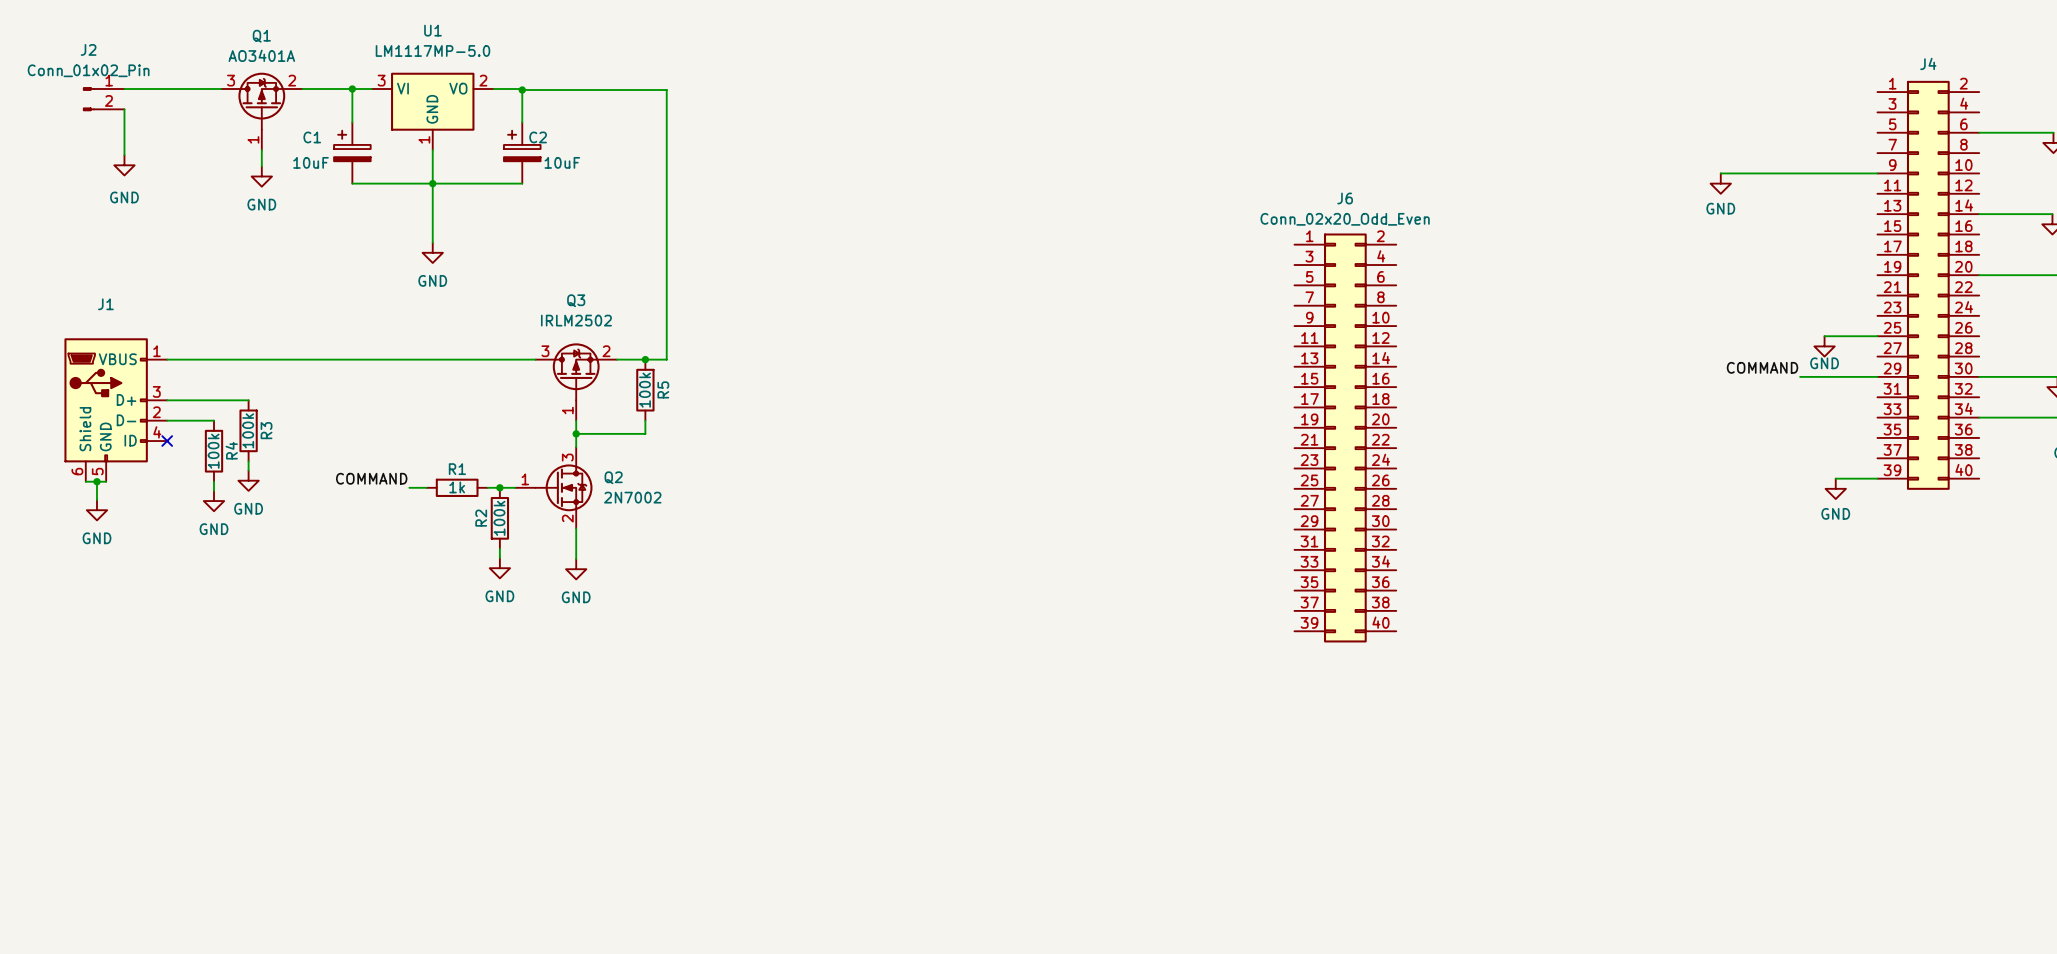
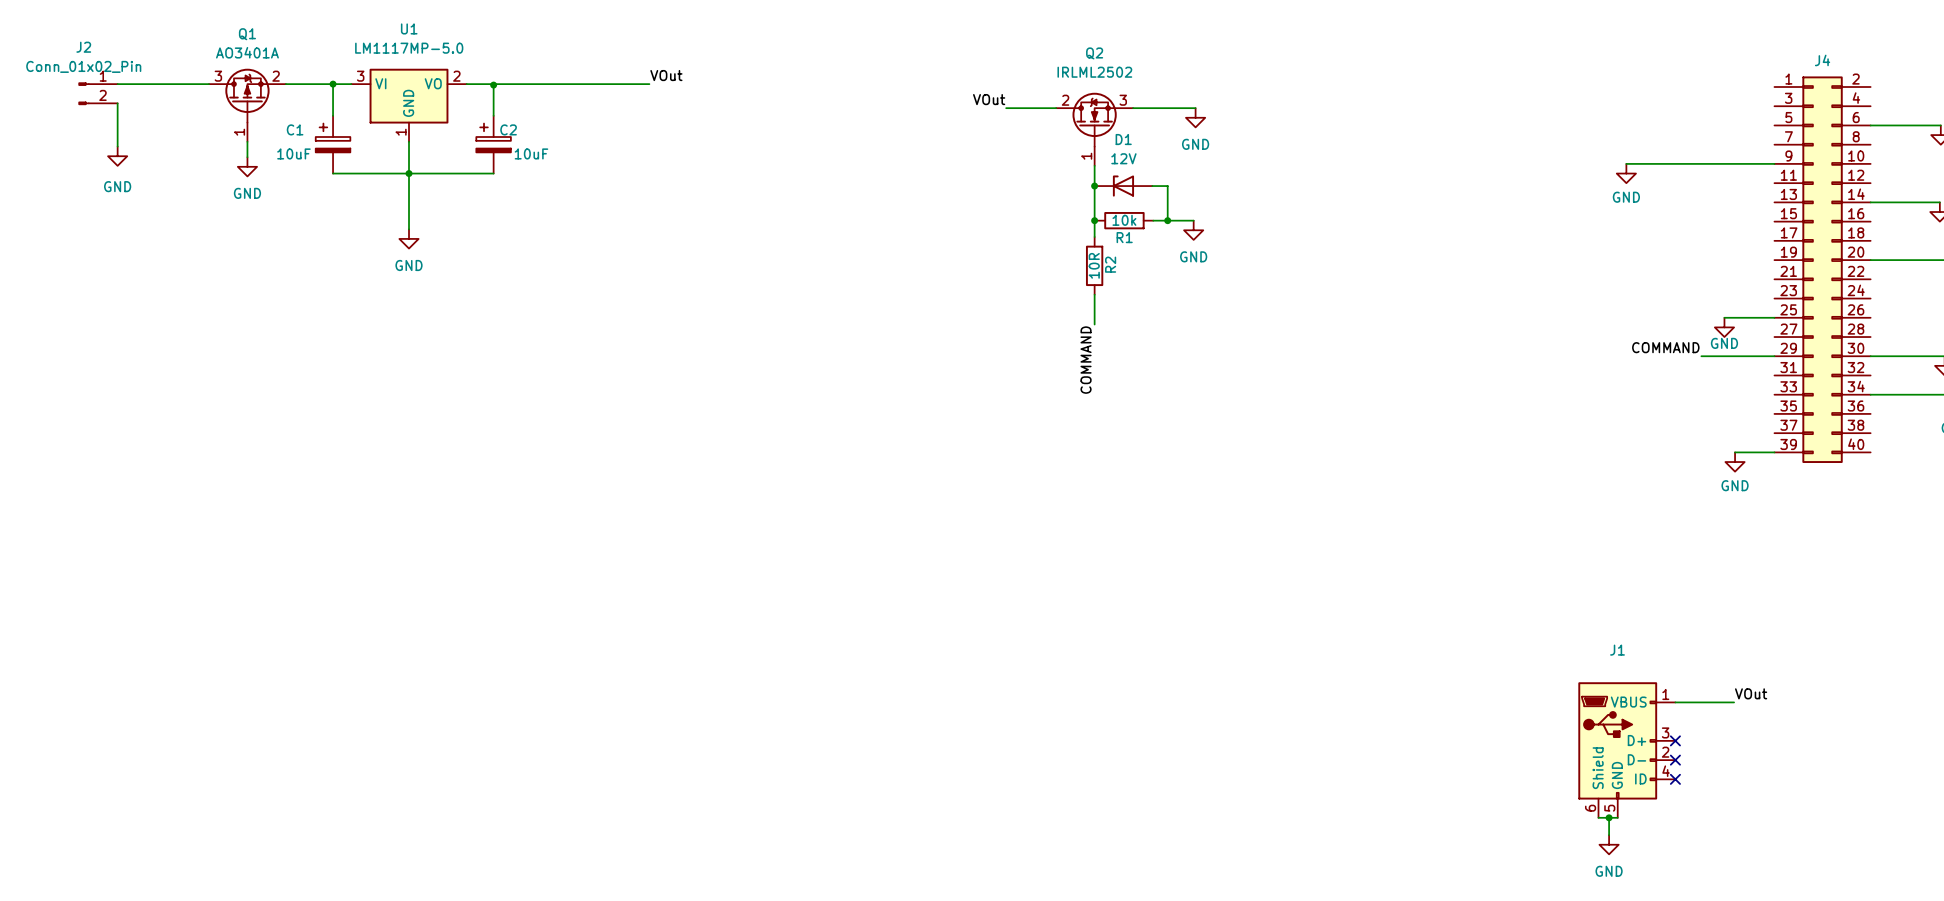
label: none -> VOut (666, 75)
wire: none -> (493, 84) (649, 84)
wire: (522, 90) (666, 90) (666, 359) (616, 359) -> none
label: none -> VOut (989, 99)
wire: none -> (1006, 108) (1056, 108)
wire: none -> (1133, 108) (1195, 108)
power symbol: none -> GND (1195, 117)
wire: none -> (1094, 165) (1094, 237)
junction: none -> (1094, 186)
D1: none -> 12V (1123, 186)
wire: none -> (1152, 186) (1167, 186) (1167, 220)
junction: none -> (1094, 220)
wire: none -> (1153, 220) (1193, 220)
junction: none -> (1167, 220)
power symbol: none -> GND (1193, 230)
wire: none -> (1094, 294) (1094, 324)
wire: (167, 359) (535, 359) -> none
junction: (645, 359) -> none
label: none -> COMMAND (1086, 360)
Q3: IRLM2502 (576, 382) -> none
R5: 100k (645, 390) -> none
wire: (167, 400) (248, 400) -> none
J1 position: (115, 409) -> (1626, 750)
wire: (167, 420) (214, 420) -> none
wire: (576, 420) (576, 447) -> none
wire: (645, 420) (645, 433) (576, 433) -> none
R3: 100k (248, 430) -> none
junction: (576, 433) -> none
J6: Conn_02x20_Odd_Even (1345, 437) -> none
no-connect mark: (167, 441) -> none
Q2 symbol: [515, 447, 593, 529] -> [1056, 92, 1134, 166]
R4: 100k (214, 451) -> none
wire: (248, 461) (248, 470) -> none
R1 name position: R1 (457, 469) -> R1 (1124, 237)
Q2 name position: Q2 (613, 477) -> Q2 (1094, 53)
label: COMMAND (371, 478) -> none
power symbol: GND (248, 480) -> none
wire: (85, 481) (106, 481) -> none
wire: (96, 481) (96, 500) -> none
junction: (96, 481) -> none
wire: (214, 481) (214, 490) -> none
wire: (409, 487) (426, 487) -> none
R1 position: (457, 487) -> (1124, 220)
R1 value: 1k (457, 487) -> 10k (1124, 220)
wire: (487, 487) (515, 487) -> none
junction: (499, 487) -> none
Q2 value: 2N7002 (632, 497) -> IRLML2502 (1094, 72)
power symbol: GND (214, 501) -> none
power symbol: GND (96, 510) -> none
R2 name position: R2 (481, 518) -> R2 (1110, 264)
R2 position: (499, 518) -> (1094, 265)
R2 value: 100k (499, 518) -> 10R (1094, 265)
wire: (576, 528) (576, 559) -> none
wire: (499, 548) (499, 558) -> none
power symbol: GND (499, 568) -> none
power symbol: GND (576, 569) -> none
label: none -> VOut (1751, 693)
wire: none -> (1675, 702) (1734, 702)
no-connect mark: none -> (1675, 740)
no-connect mark: none -> (1675, 760)
no-connect mark: none -> (1675, 779)
wire: none -> (1598, 817) (1617, 817)
wire: none -> (1609, 817) (1609, 835)
junction: none -> (1609, 817)
power symbol: none -> GND (1609, 844)

